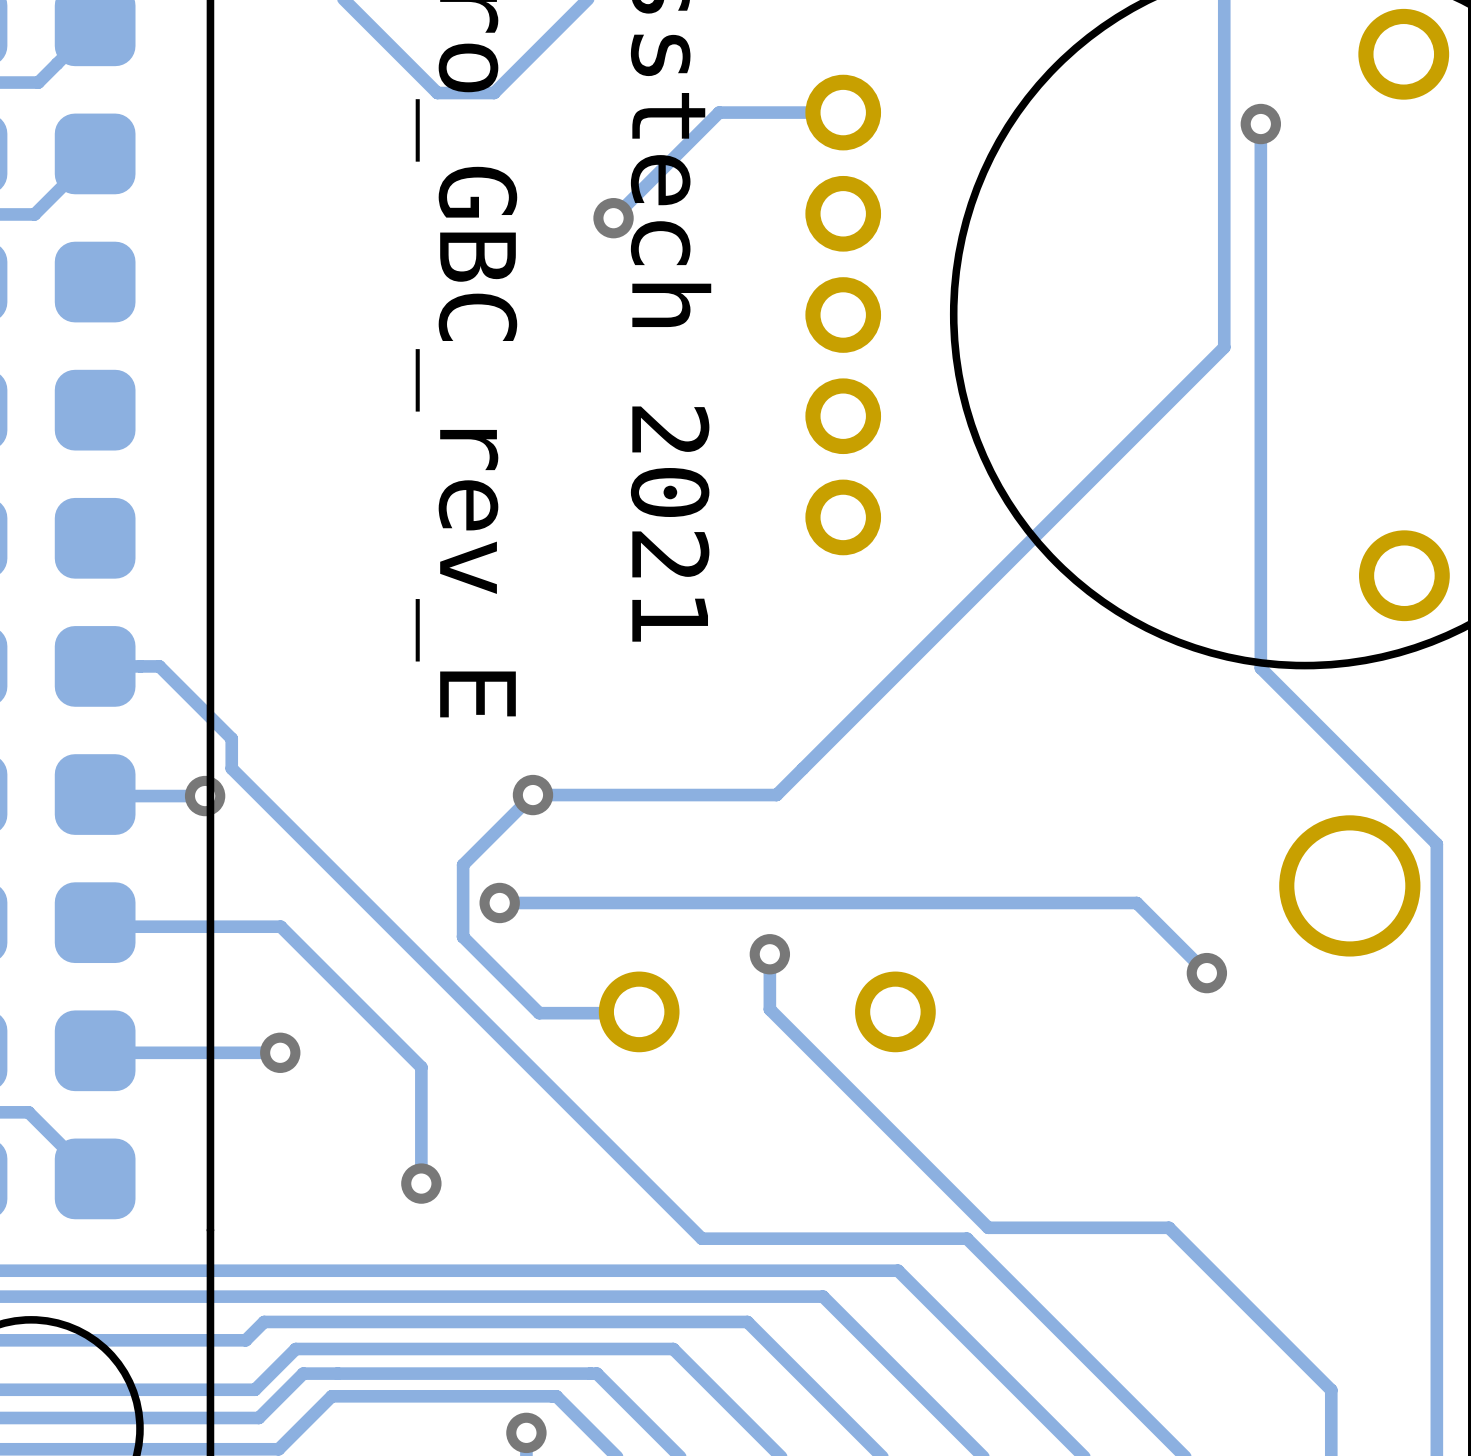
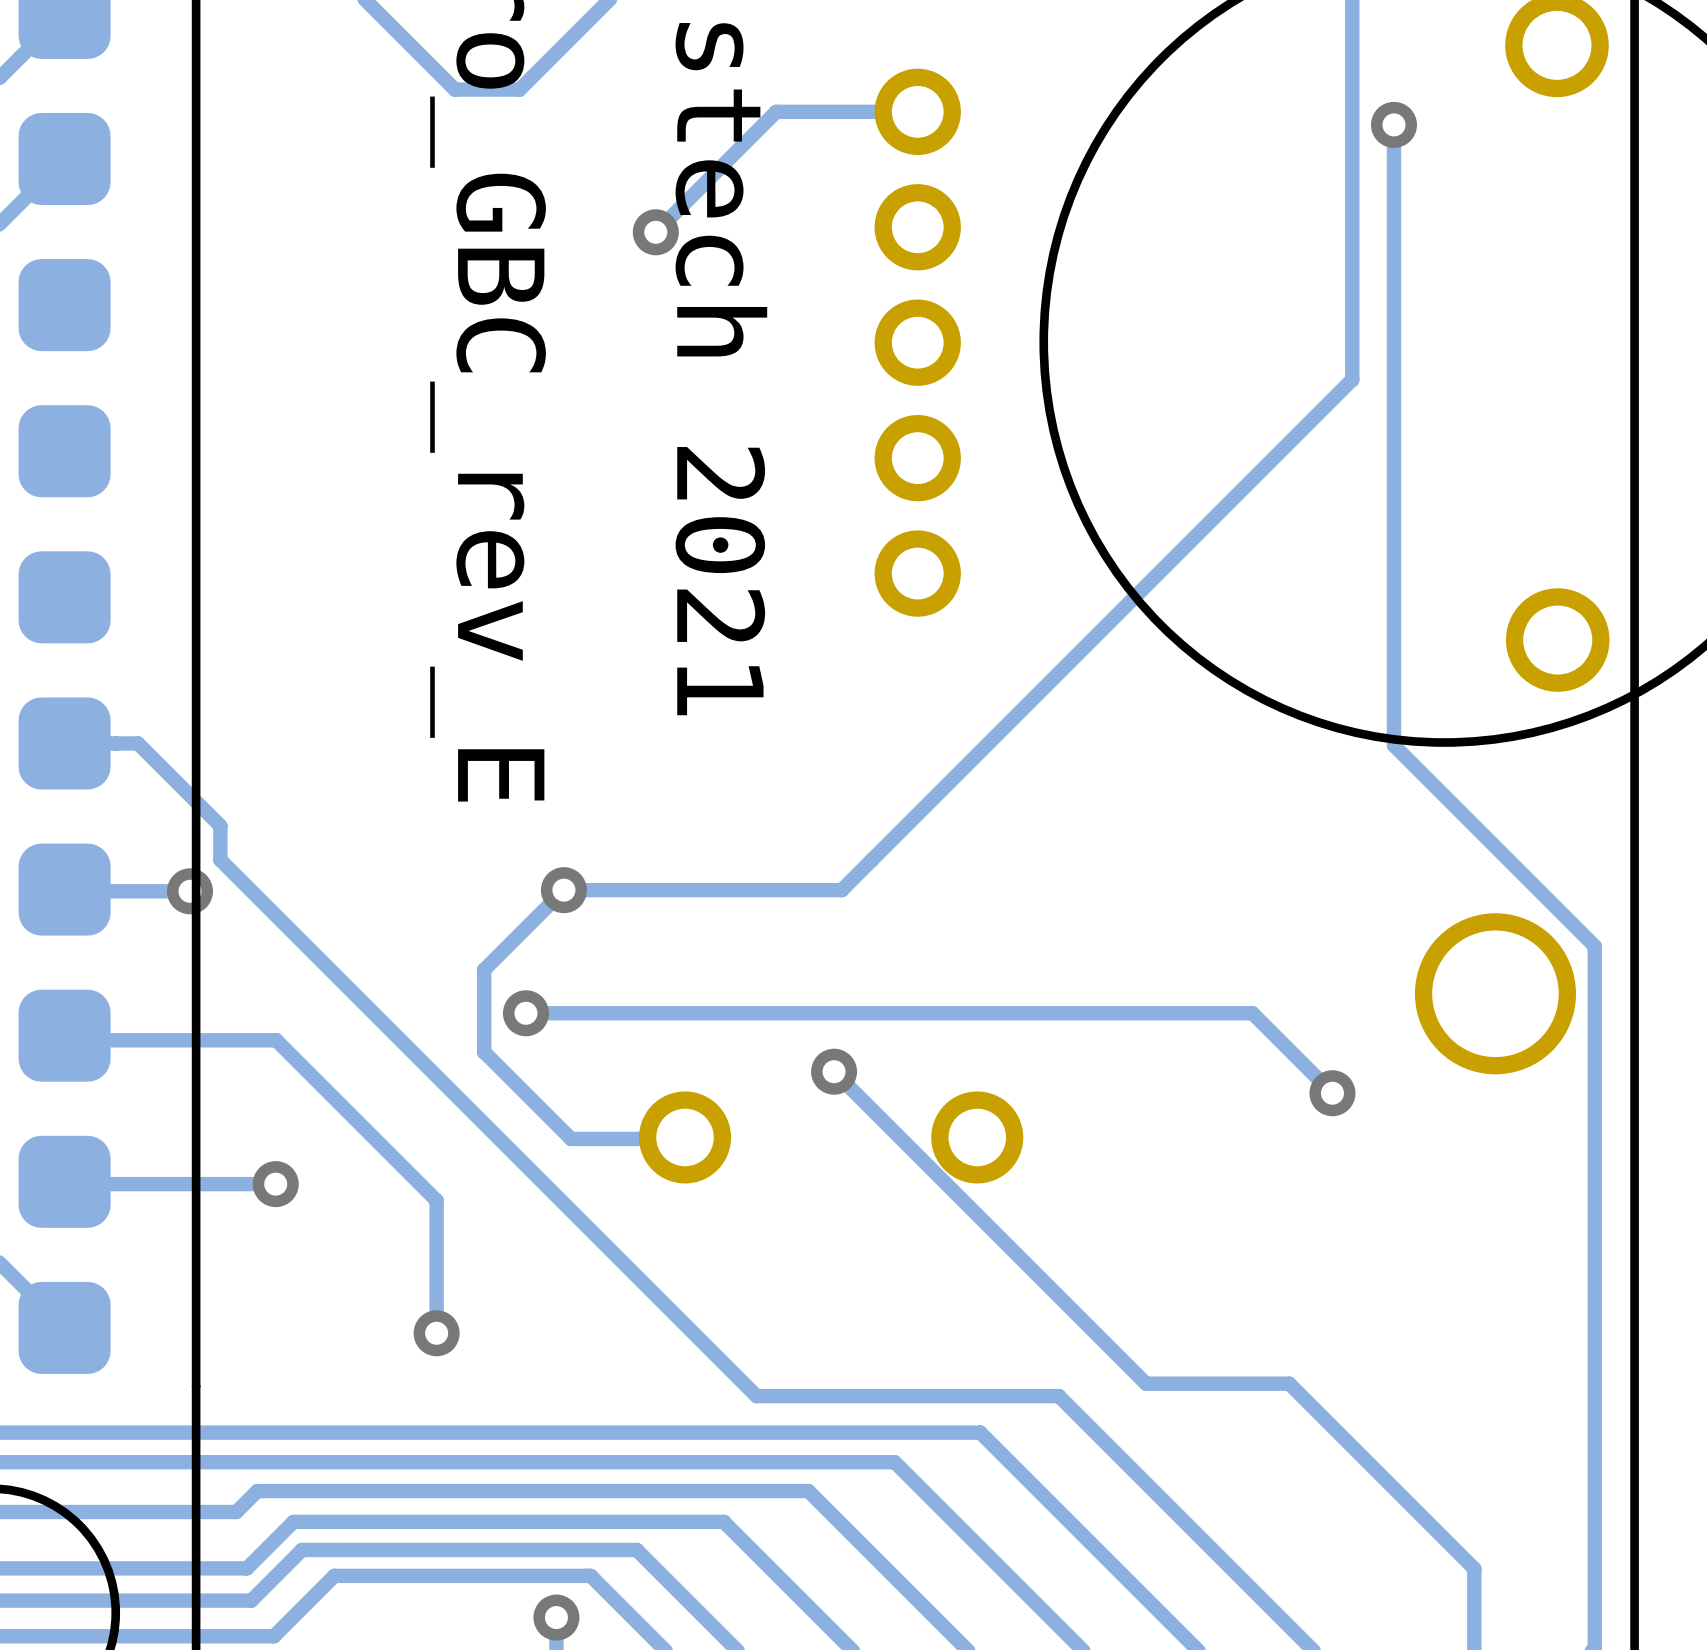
track: (769, 954) (769, 1009) (988, 1227) (1043, 1227) -> (834, 1071) (1146, 1383)

